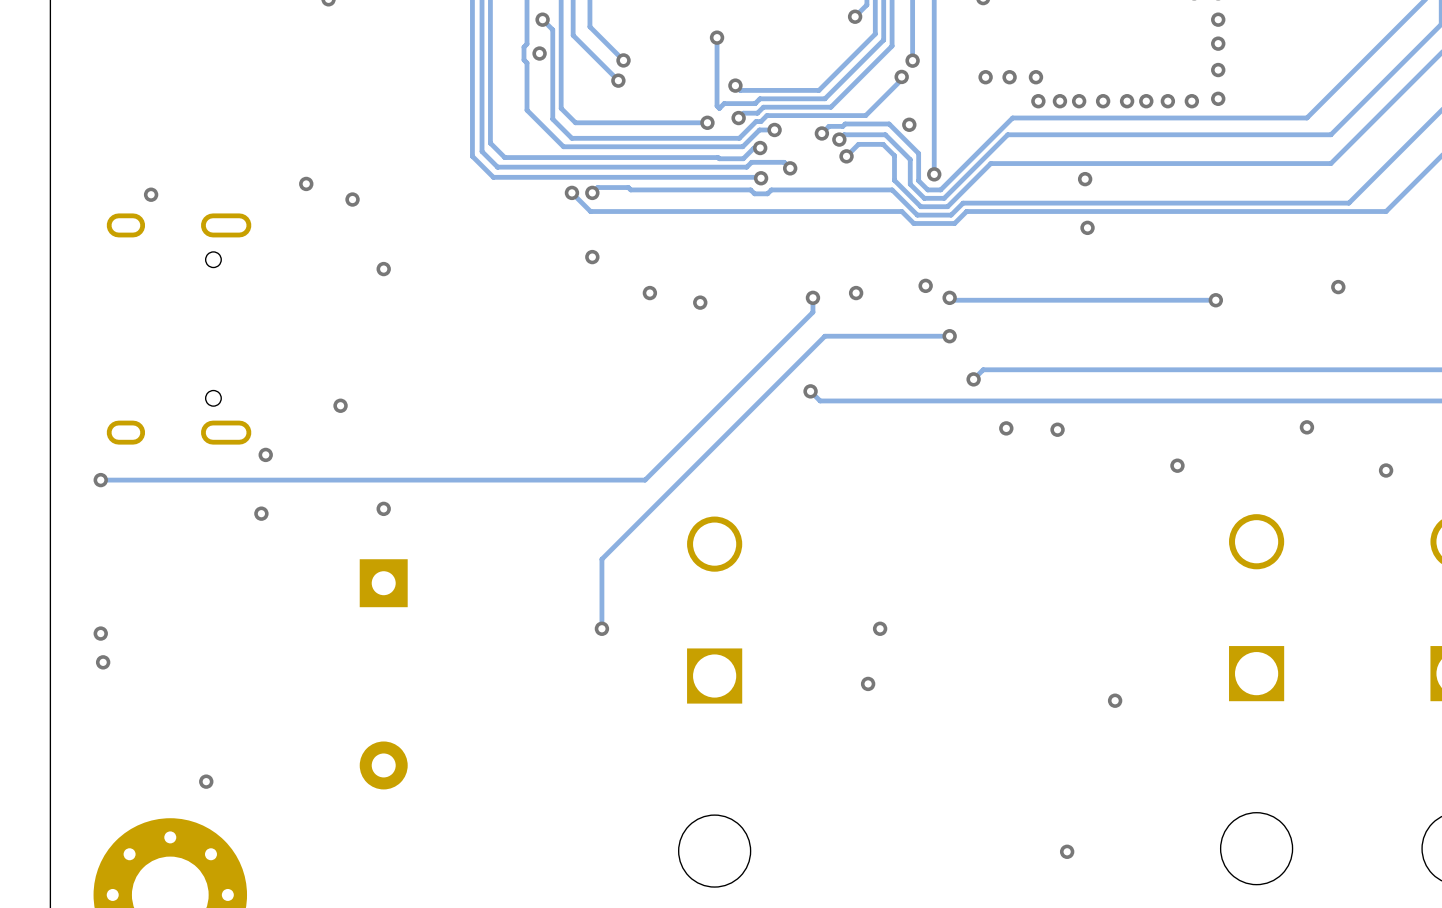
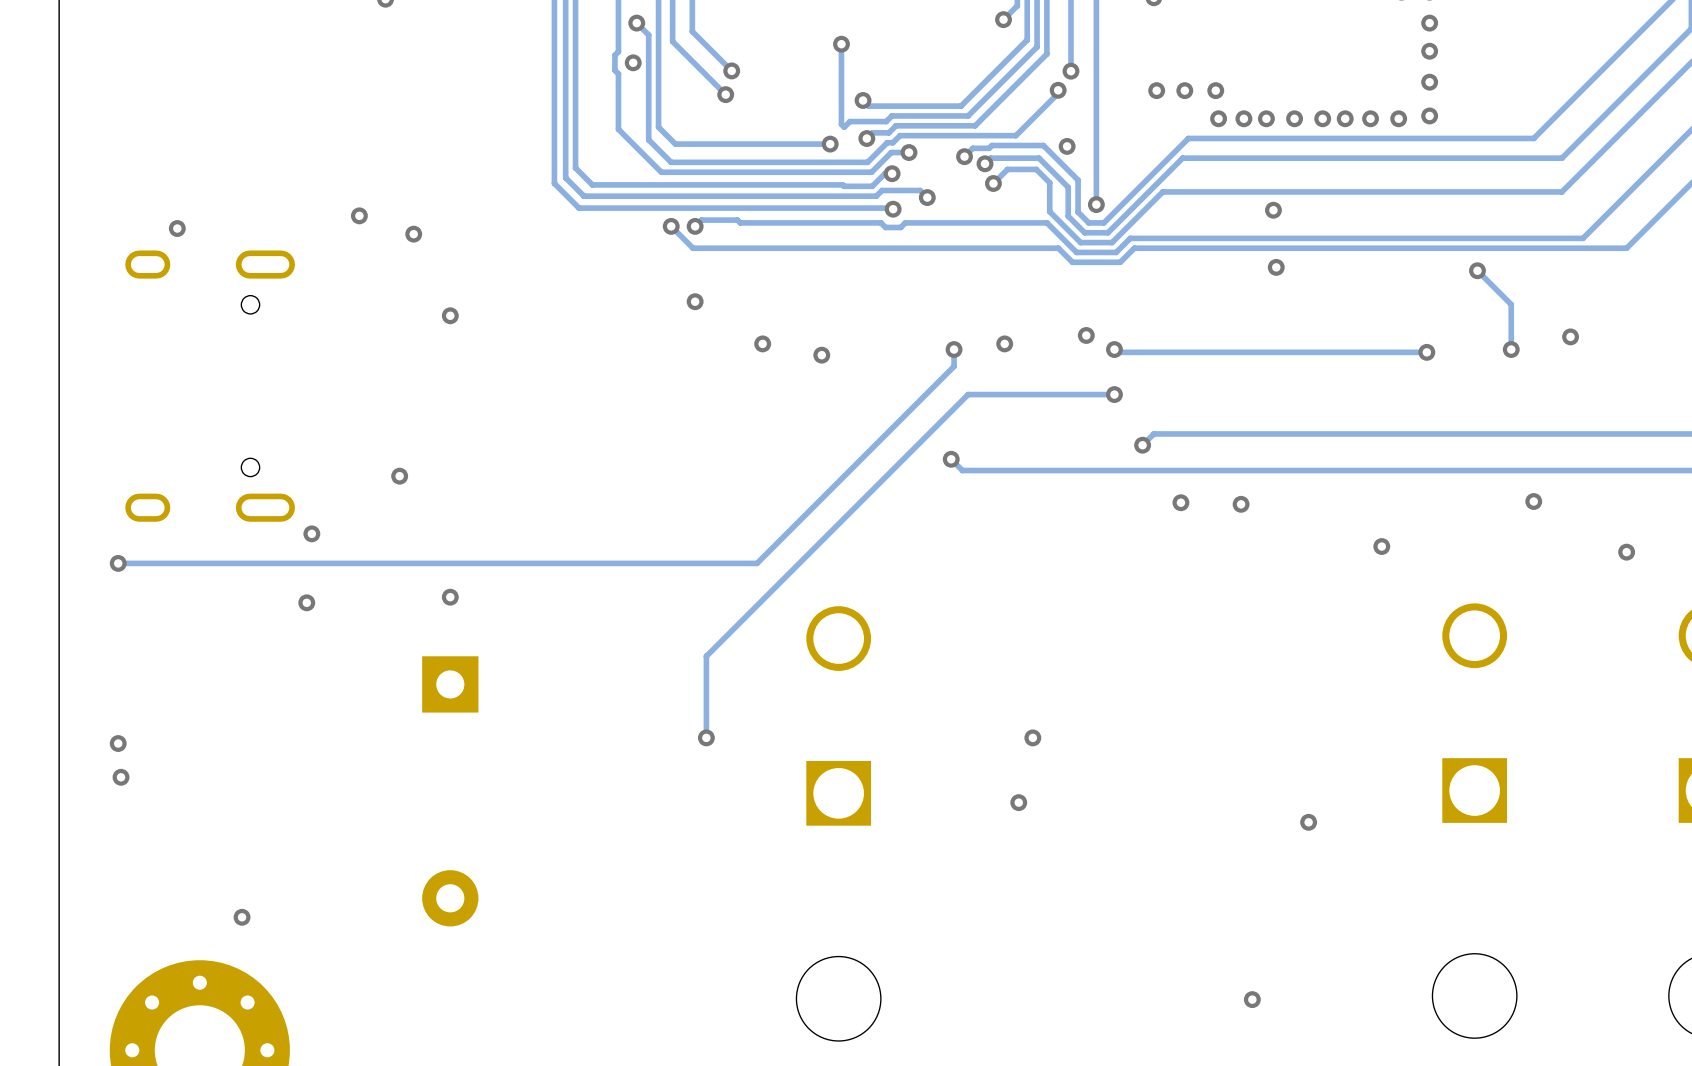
track: none -> (1477, 270) (1511, 304) (1511, 349)
via: none -> (1477, 270)
via: none -> (1511, 349)

